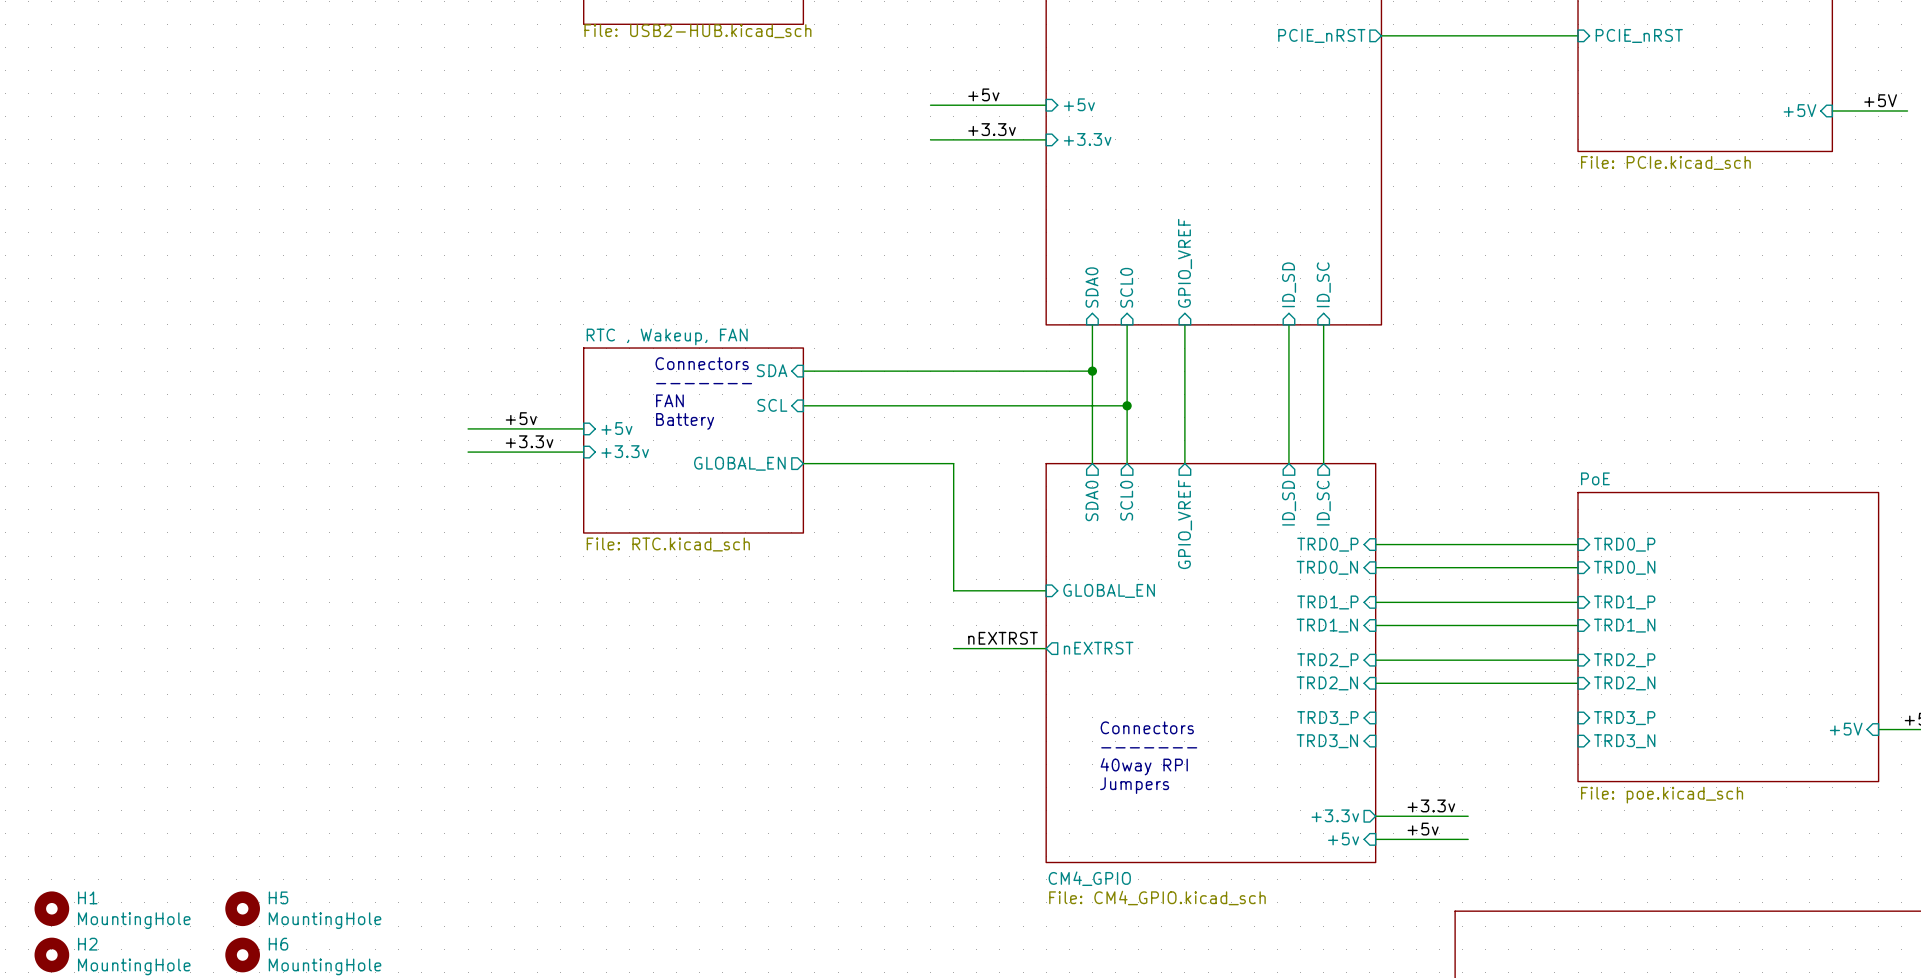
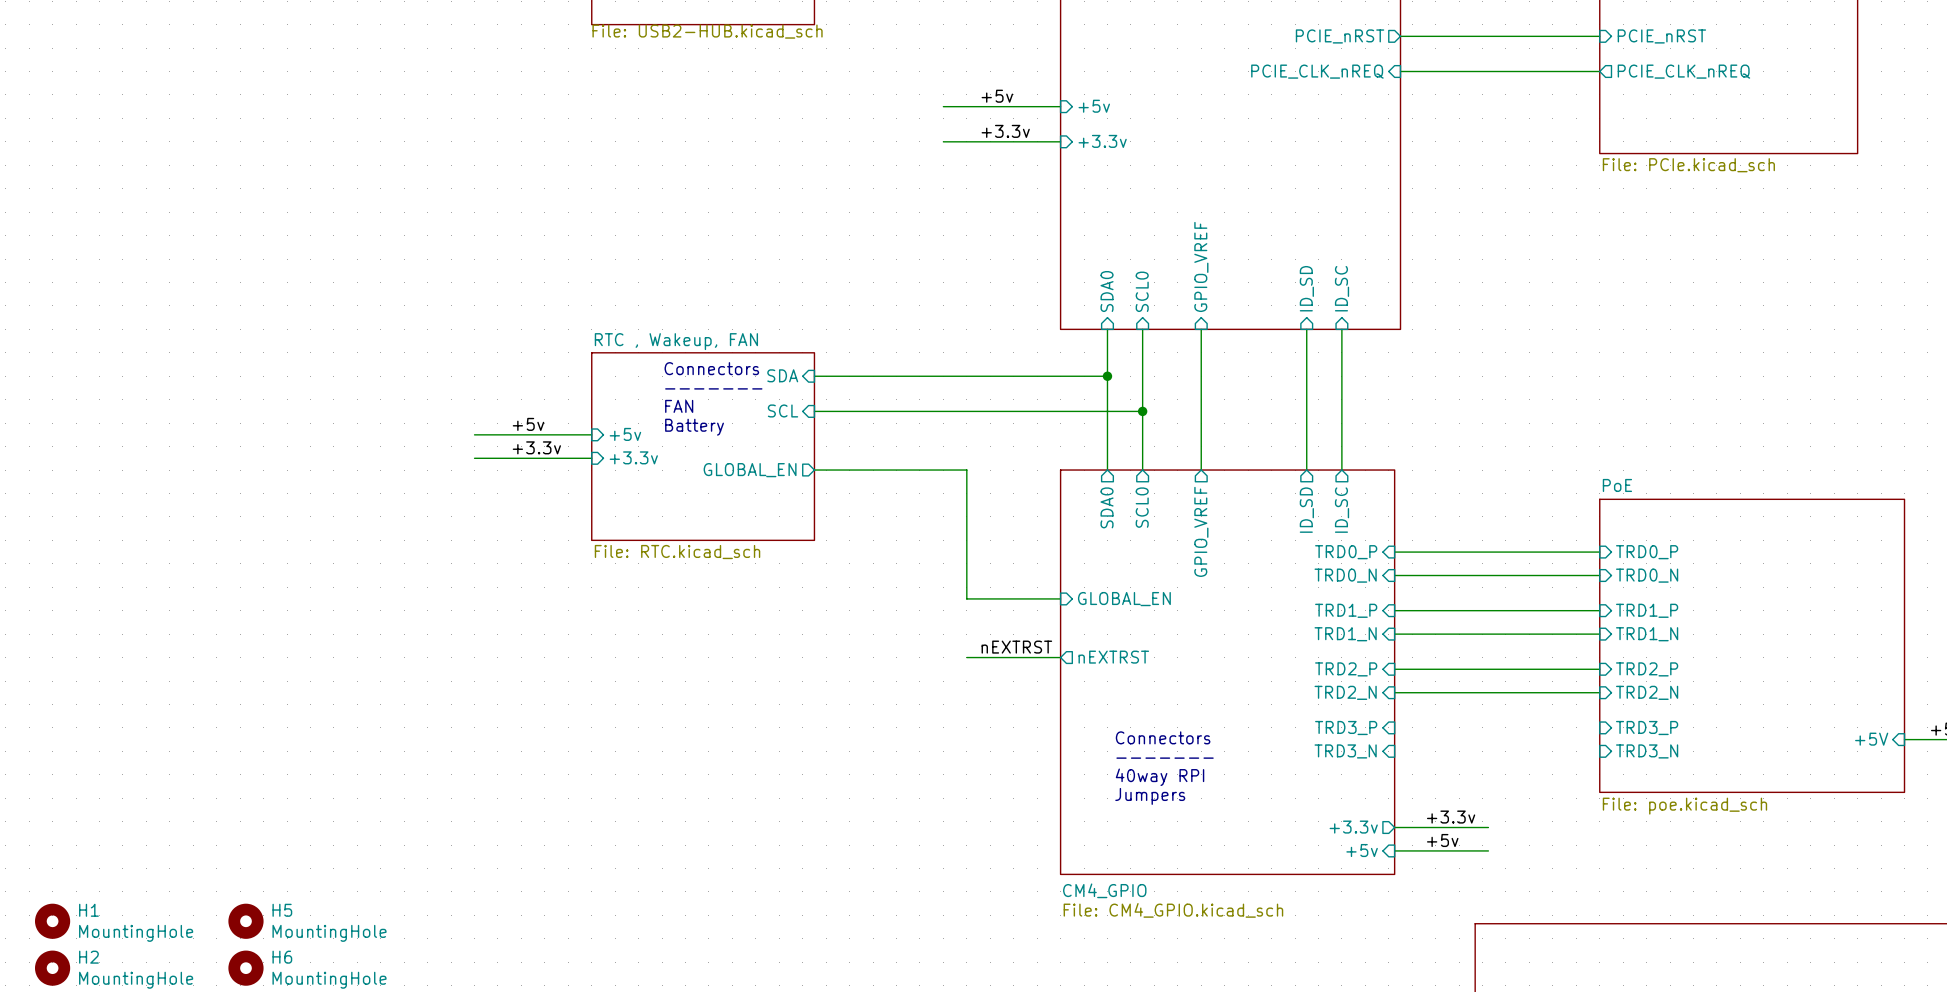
sheet pin: none -> PCIE_CLK_nREQ (1317, 71)
wire: none -> (1400, 71) (1599, 71)
sheet pin: none -> PCIE_CLK_nREQ (1683, 71)
label: +5V (1880, 100) -> none
sheet pin: +5V (1799, 110) -> none
wire: (1832, 110) (1907, 110) -> none

